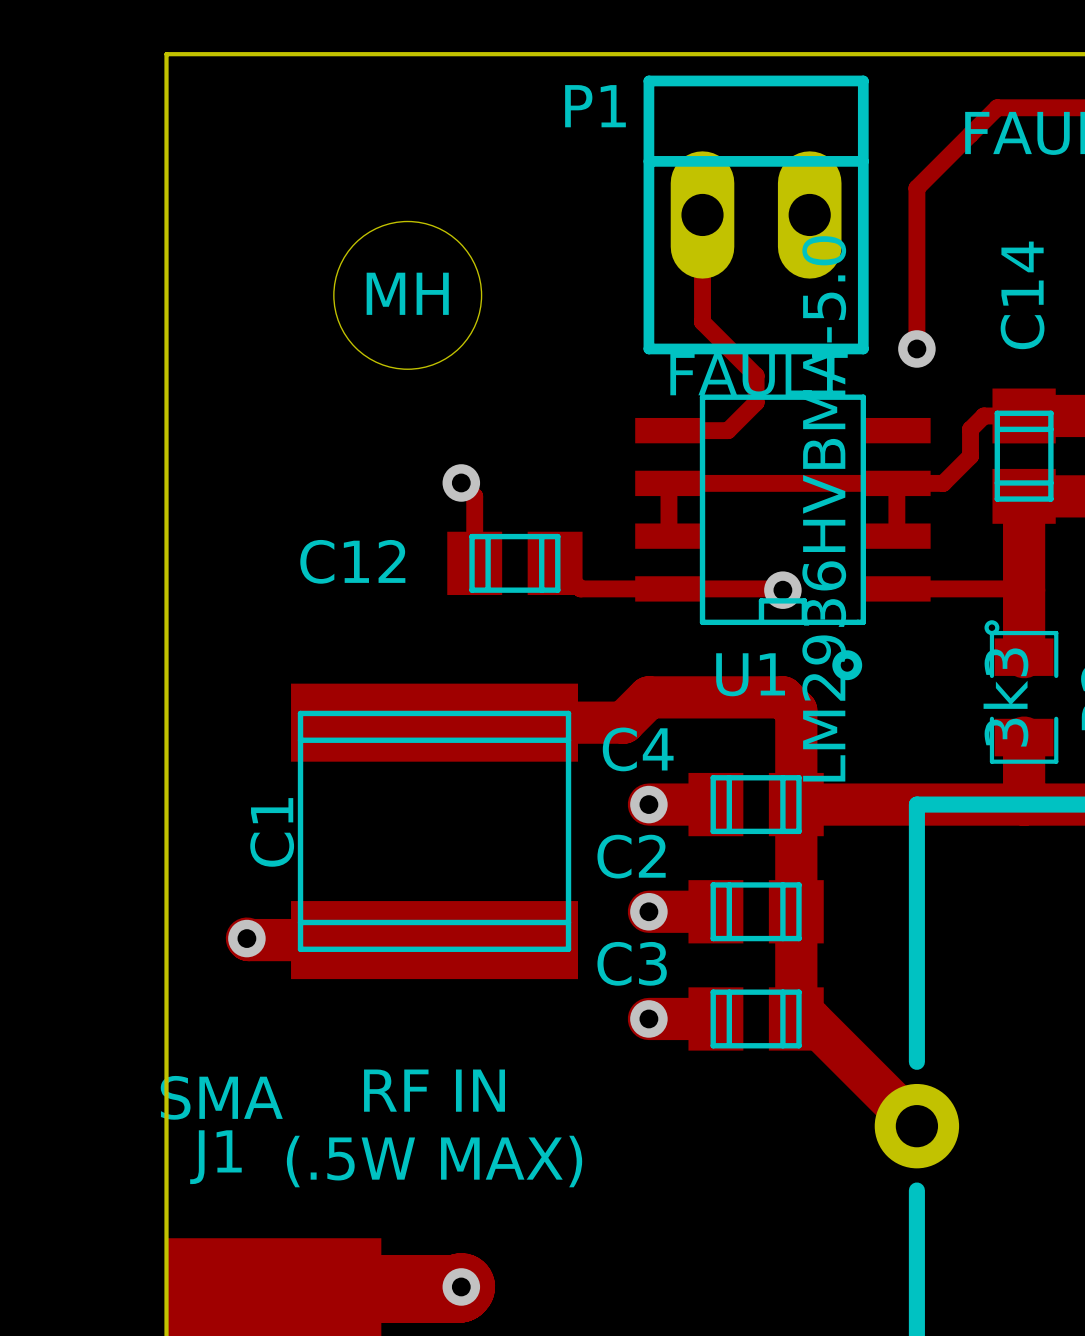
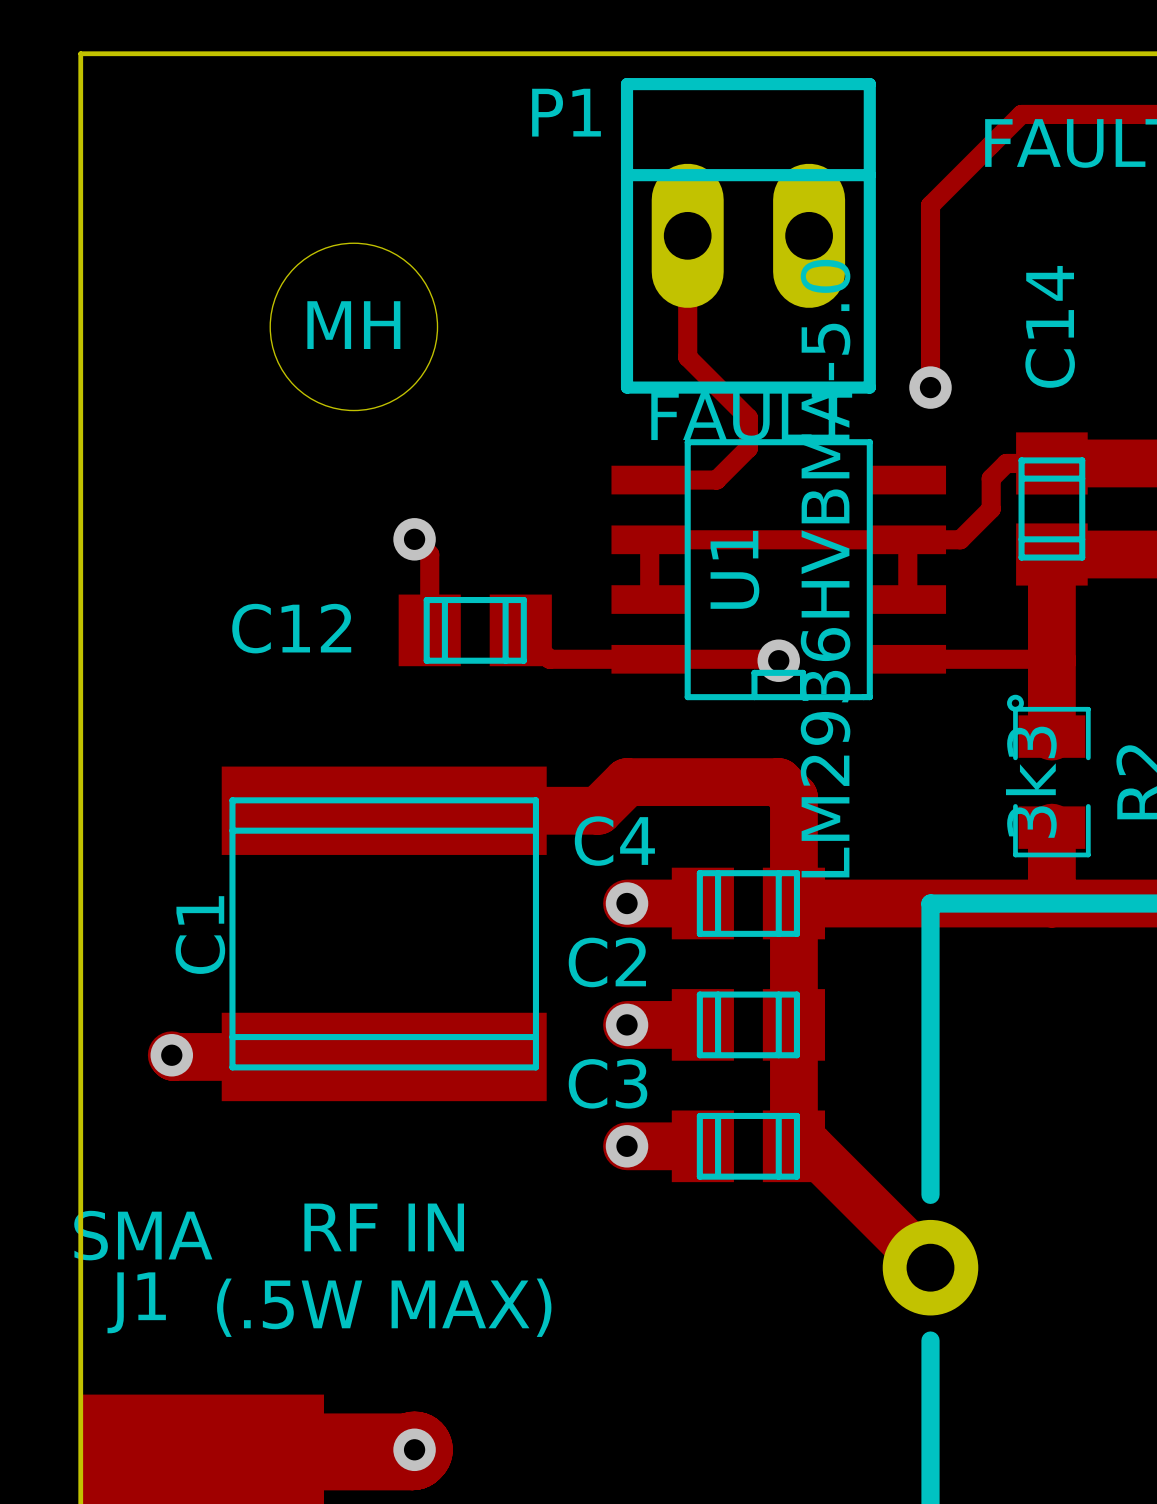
drawing: [832, 650, 863, 681] -> none
U1 name rotation: 0° (750, 674) -> 90° counterclockwise (734, 569)
U1 name position: U1 (750, 674) -> U1 (734, 569)

